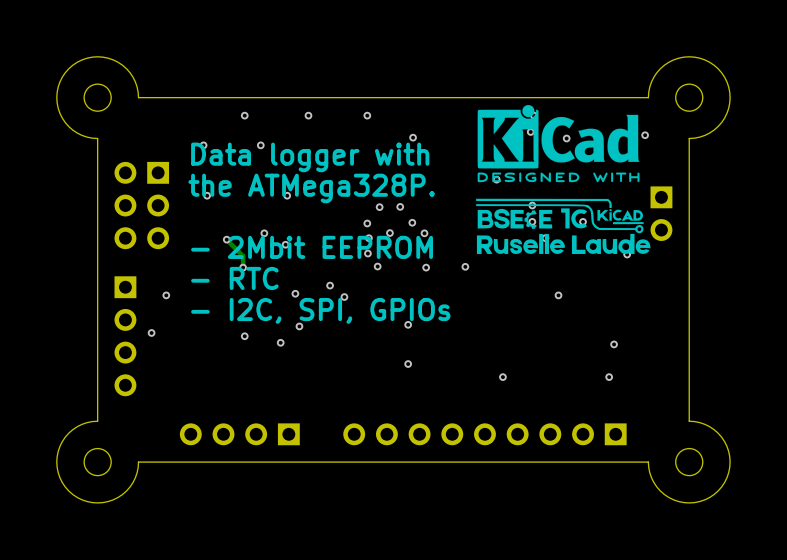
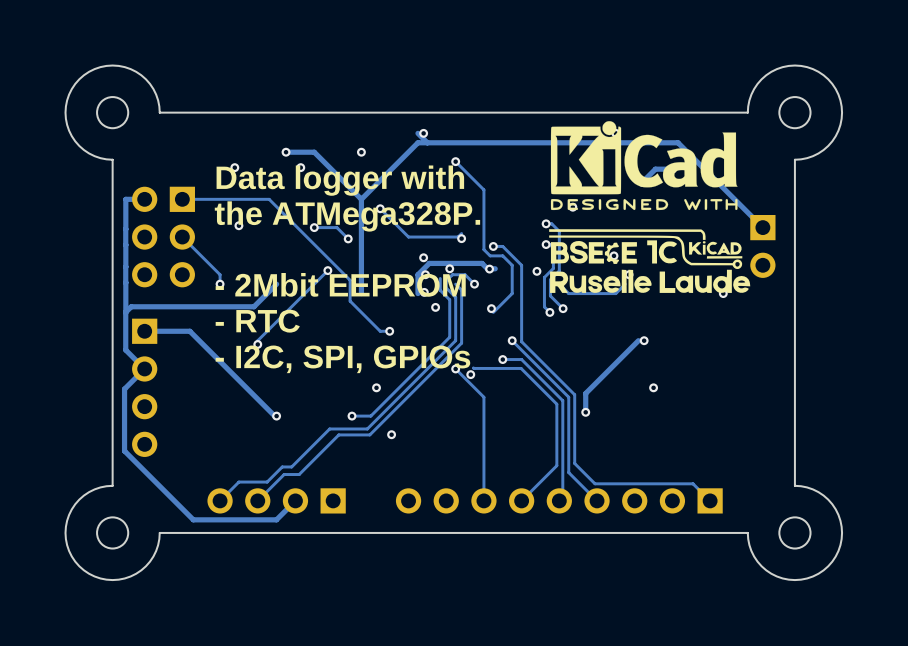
via position: (244, 115) -> (286, 152)
via position: (308, 115) -> (361, 152)
track: none -> (417, 133) (427, 142)
track: none -> (286, 152) (314, 152) (361, 199)
via: (530, 131) -> none
via: (645, 135) -> none
via position: (413, 137) -> (455, 161)
via: (566, 138) -> none
track: none -> (455, 161) (483, 189) (483, 249) (490, 255) (502, 255) (512, 265) (512, 293) (493, 312)
track: none -> (672, 169) (655, 169) (642, 182)
track: none -> (144, 199) (125, 199) (125, 350) (144, 368) (124, 389) (124, 451) (193, 519) (276, 519) (295, 500)
track: none -> (182, 199) (269, 199) (350, 280) (350, 301) (380, 331) (389, 331)
track: none -> (361, 199) (361, 293)
track: none -> (361, 199) (417, 142) (678, 142) (762, 227)
track: none -> (380, 208) (408, 237) (458, 237) (461, 233)
via: none -> (380, 208)
track: none -> (546, 223) (551, 223) (559, 231) (559, 270) (550, 279) (550, 295) (563, 308)
via: none -> (546, 223)
via: (287, 195) -> none
track: none -> (314, 227) (336, 227) (348, 238)
via: none -> (314, 227)
track: none -> (182, 237) (220, 274) (220, 284)
via: (532, 205) -> none
via: none -> (348, 238)
via: (379, 207) -> none
track: none -> (546, 244) (549, 244) (553, 248) (553, 268) (544, 277) (544, 306) (549, 312)
via: none -> (546, 244)
track: none -> (493, 246) (502, 246) (521, 265) (521, 341) (574, 394) (574, 463) (595, 483) (693, 483) (710, 500)
via: none -> (493, 246)
via: (583, 221) -> none
via: (412, 222) -> none
via: (264, 233) -> none
track: none -> (495, 268) (487, 268) (482, 263) (429, 263) (417, 274) (417, 293)
track: none -> (327, 270) (257, 340) (257, 344)
via: none -> (327, 270)
via: none -> (536, 271)
track: (226, 239) (243, 256) (243, 267) -> none
via: (226, 239) -> none
track: none -> (440, 278) (440, 290) (449, 299) (449, 337) (370, 416) (352, 416)
via: (285, 244) -> none
via: none -> (220, 284)
track: none -> (276, 284) (253, 306) (131, 306) (125, 312)
track: none -> (455, 284) (461, 290) (461, 343) (369, 434) (338, 434) (299, 474) (284, 474) (257, 500)
track: none -> (474, 284) (465, 274) (452, 274) (446, 280) (446, 287) (455, 297) (455, 340) (367, 428) (329, 428) (291, 466) (282, 466) (267, 482) (238, 482) (220, 500)
via: none -> (474, 284)
track: none -> (625, 284) (615, 293) (568, 293) (559, 284)
via: (465, 266) -> none
via: (243, 267) -> none
via: none -> (563, 308)
via: none -> (549, 312)
via: (330, 285) -> none
track: none -> (144, 331) (189, 331) (276, 416)
via: none -> (389, 331)
via: (295, 293) -> none
via: (166, 295) -> none
track: none -> (512, 340) (568, 397) (568, 472) (597, 500)
via: none -> (512, 340)
track: none -> (638, 340) (585, 393) (585, 412)
via: (344, 297) -> none
via: none -> (257, 344)
track: none -> (502, 359) (521, 359) (562, 400) (562, 497) (559, 500)
via: none -> (502, 359)
track: none -> (455, 368) (483, 397) (483, 500)
via: none -> (455, 368)
track: none -> (473, 367) (521, 368) (556, 404) (556, 465) (521, 500)
via: (299, 326) -> none
via: (151, 332) -> none
via: (244, 336) -> none
via: none -> (376, 387)
via: none -> (653, 387)
via: (280, 342) -> none
via: (614, 344) -> none
via: none -> (276, 416)
via: none -> (352, 416)
via: (408, 364) -> none
via: none -> (391, 434)
via position: (502, 377) -> (585, 412)
via: (609, 377) -> none

